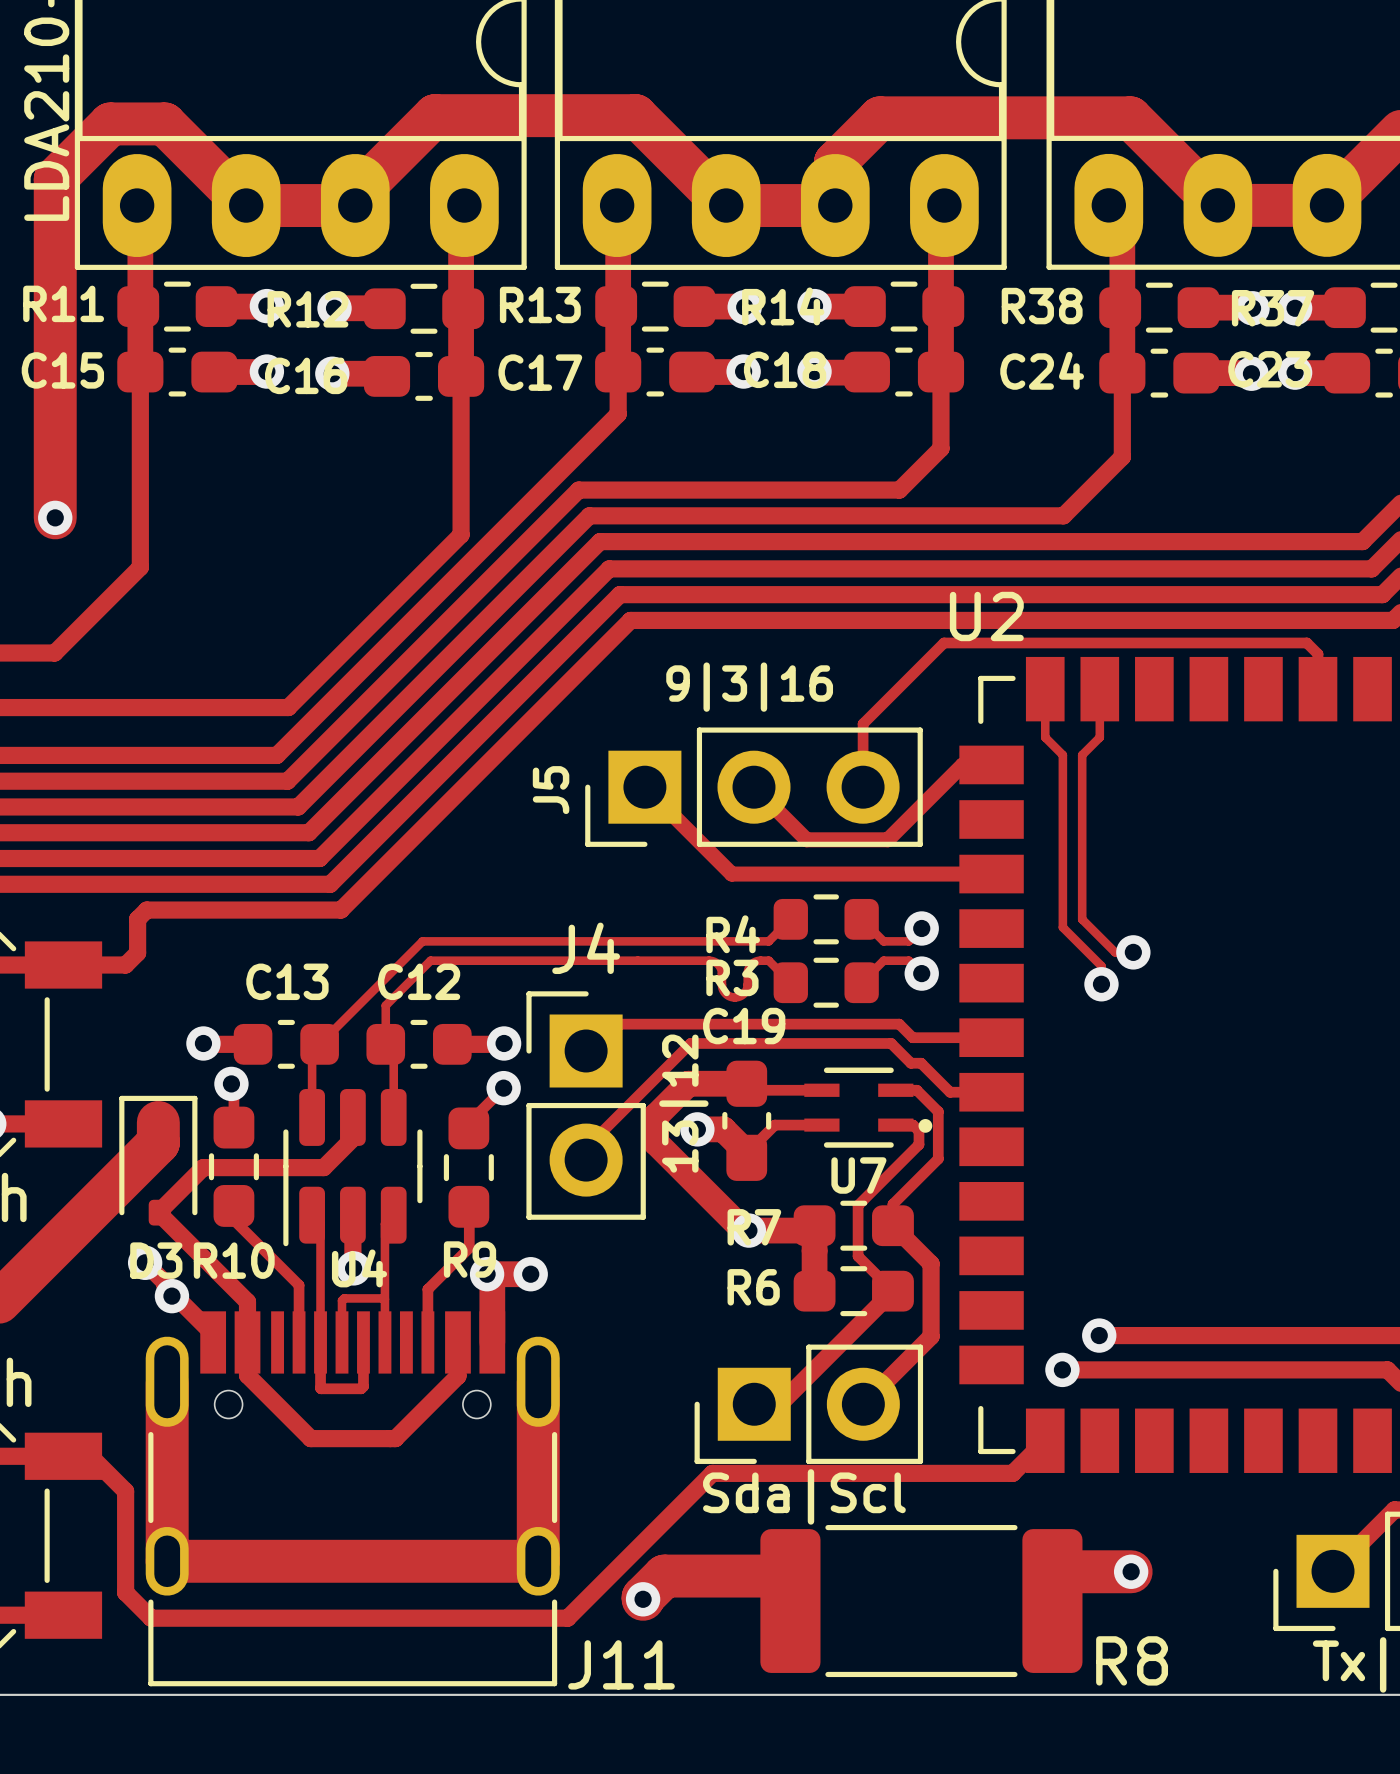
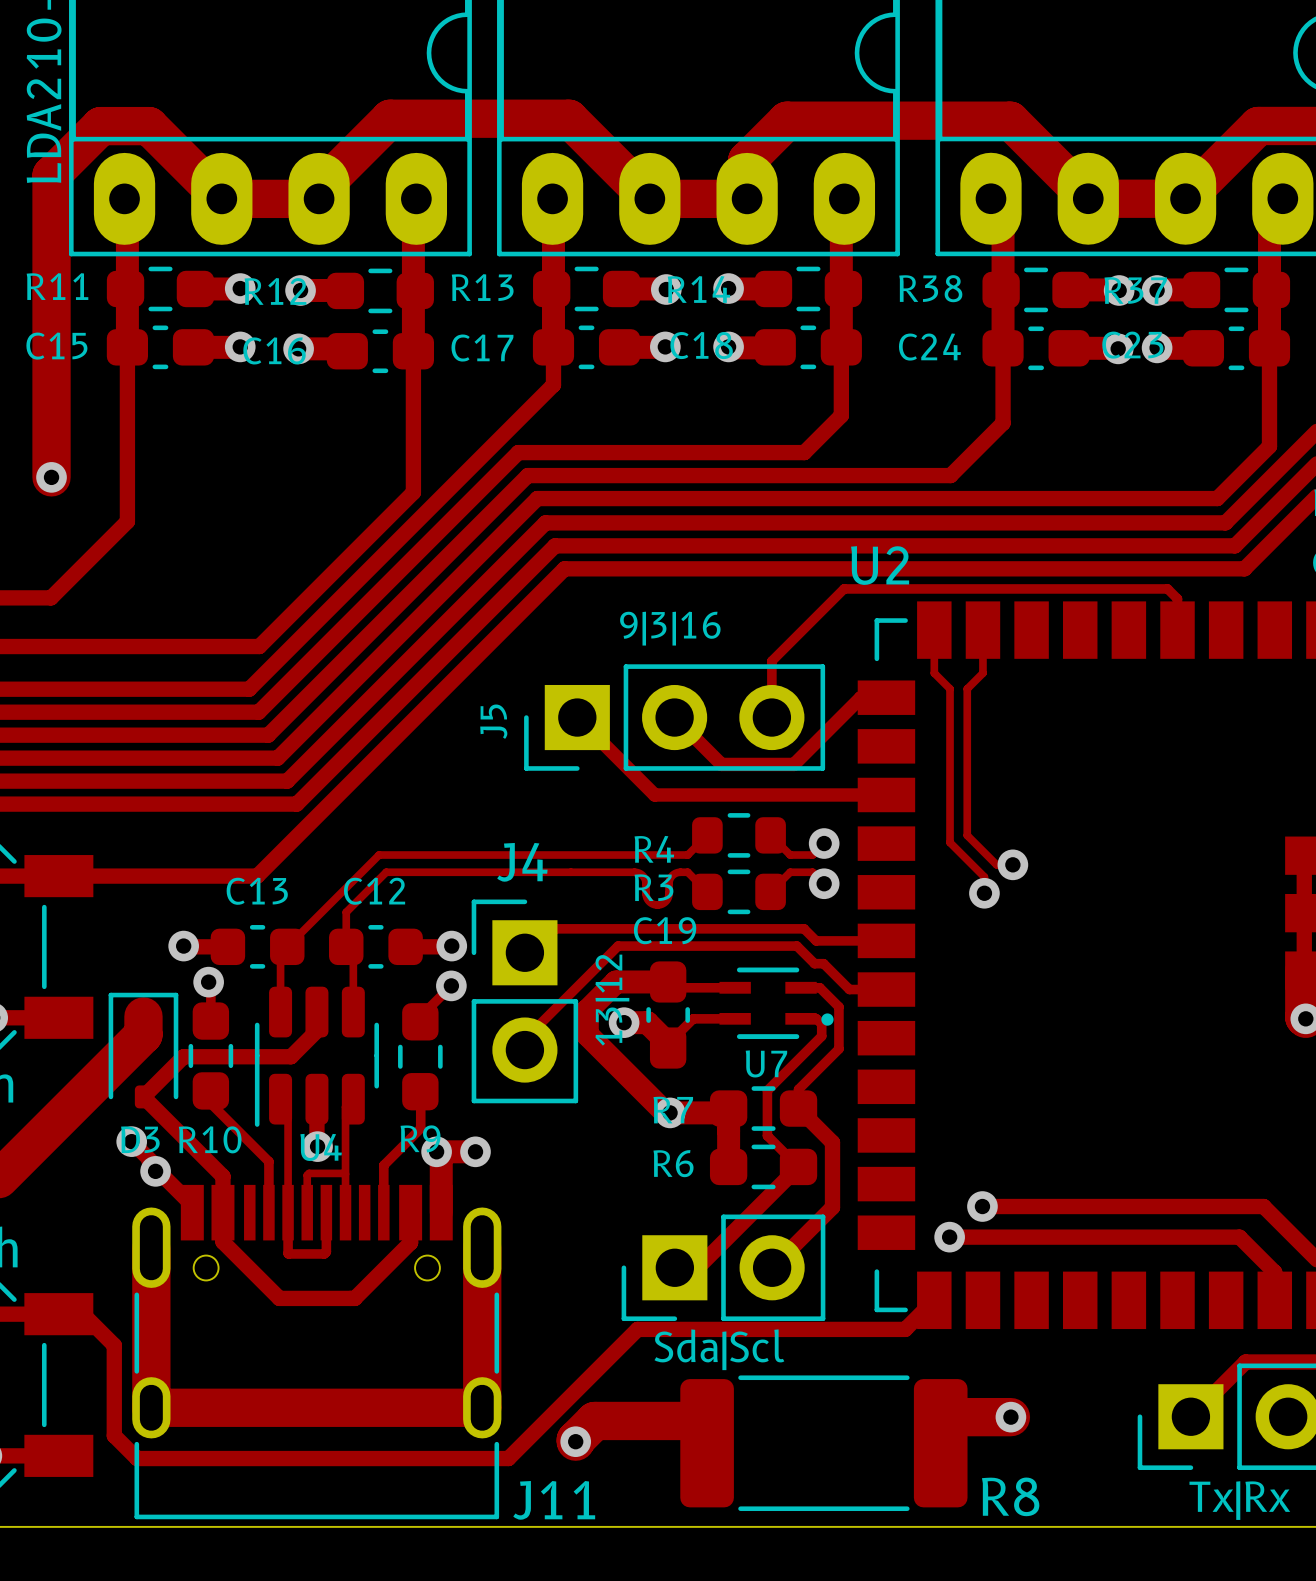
track: (340, 910) (146, 910) (137, 919) (137, 953) (125, 965) -> (306, 827) (257, 876) (114, 876)

